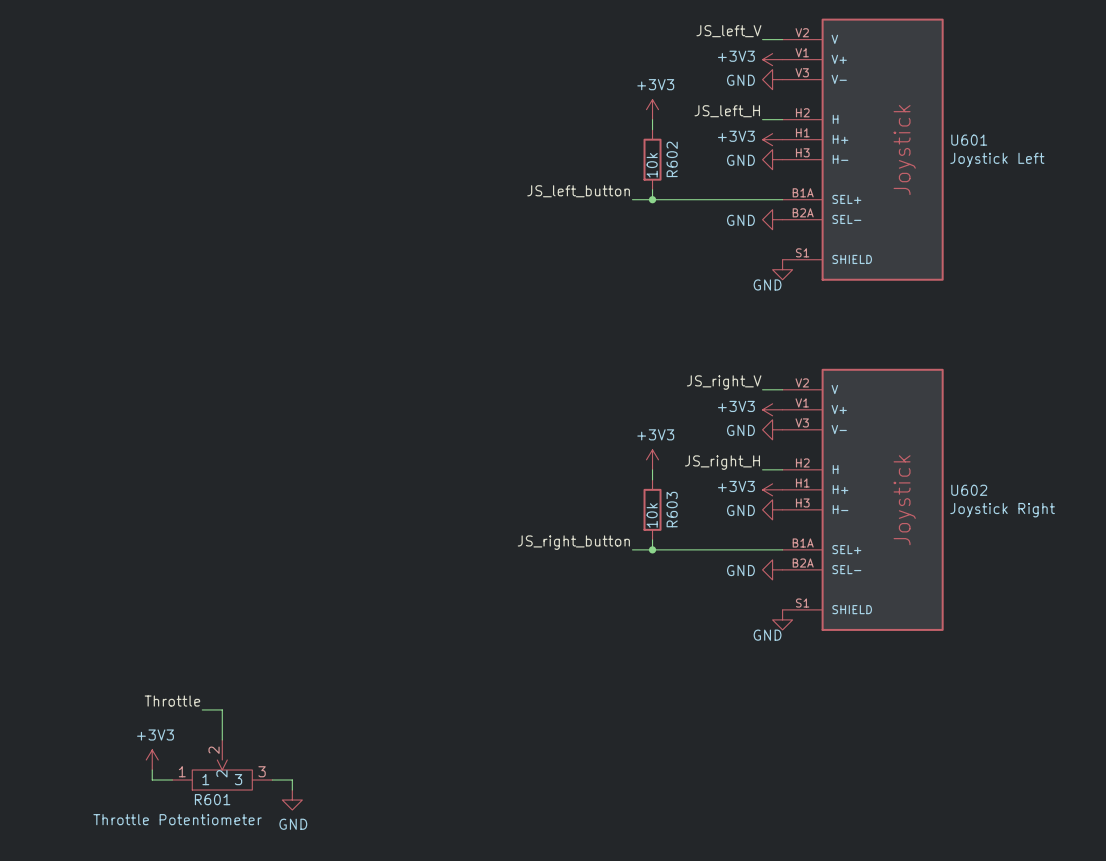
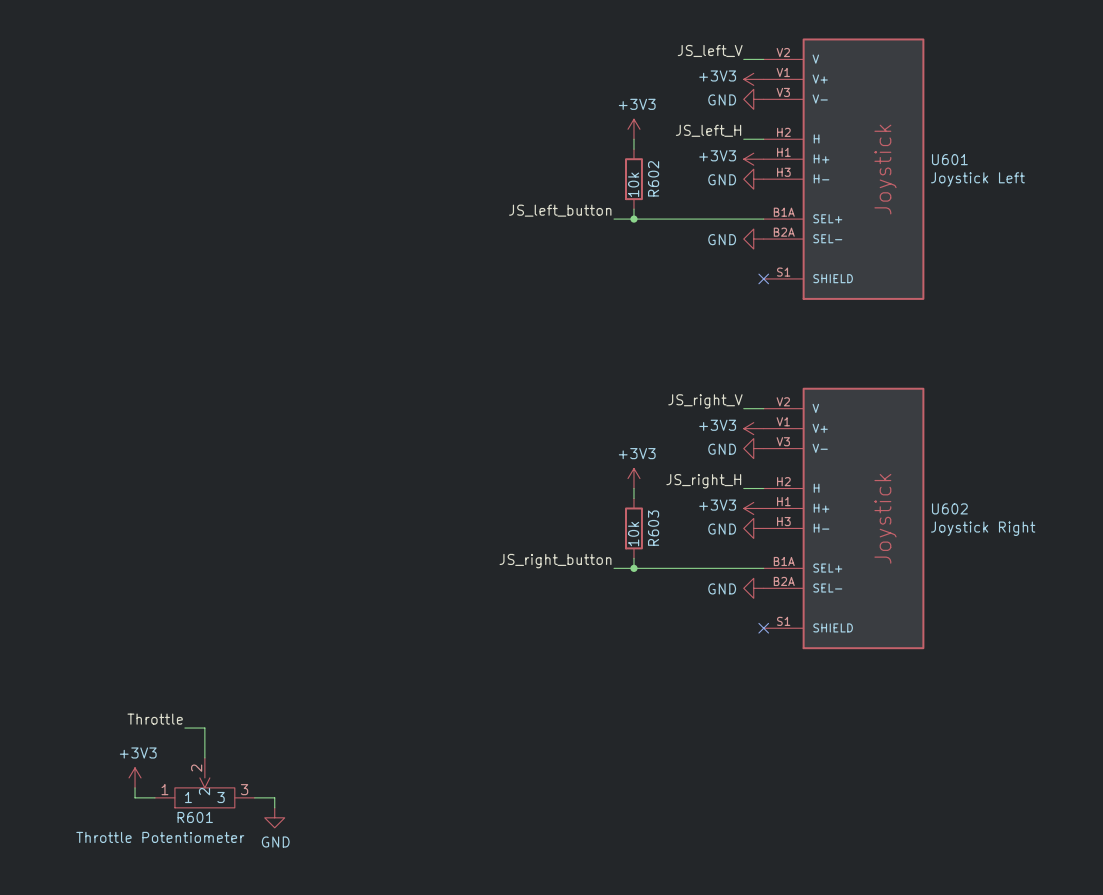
no-connect mark: none -> (763, 278)
power symbol: GND (782, 269) -> none
no-connect mark: none -> (763, 628)
power symbol: GND (782, 619) -> none

